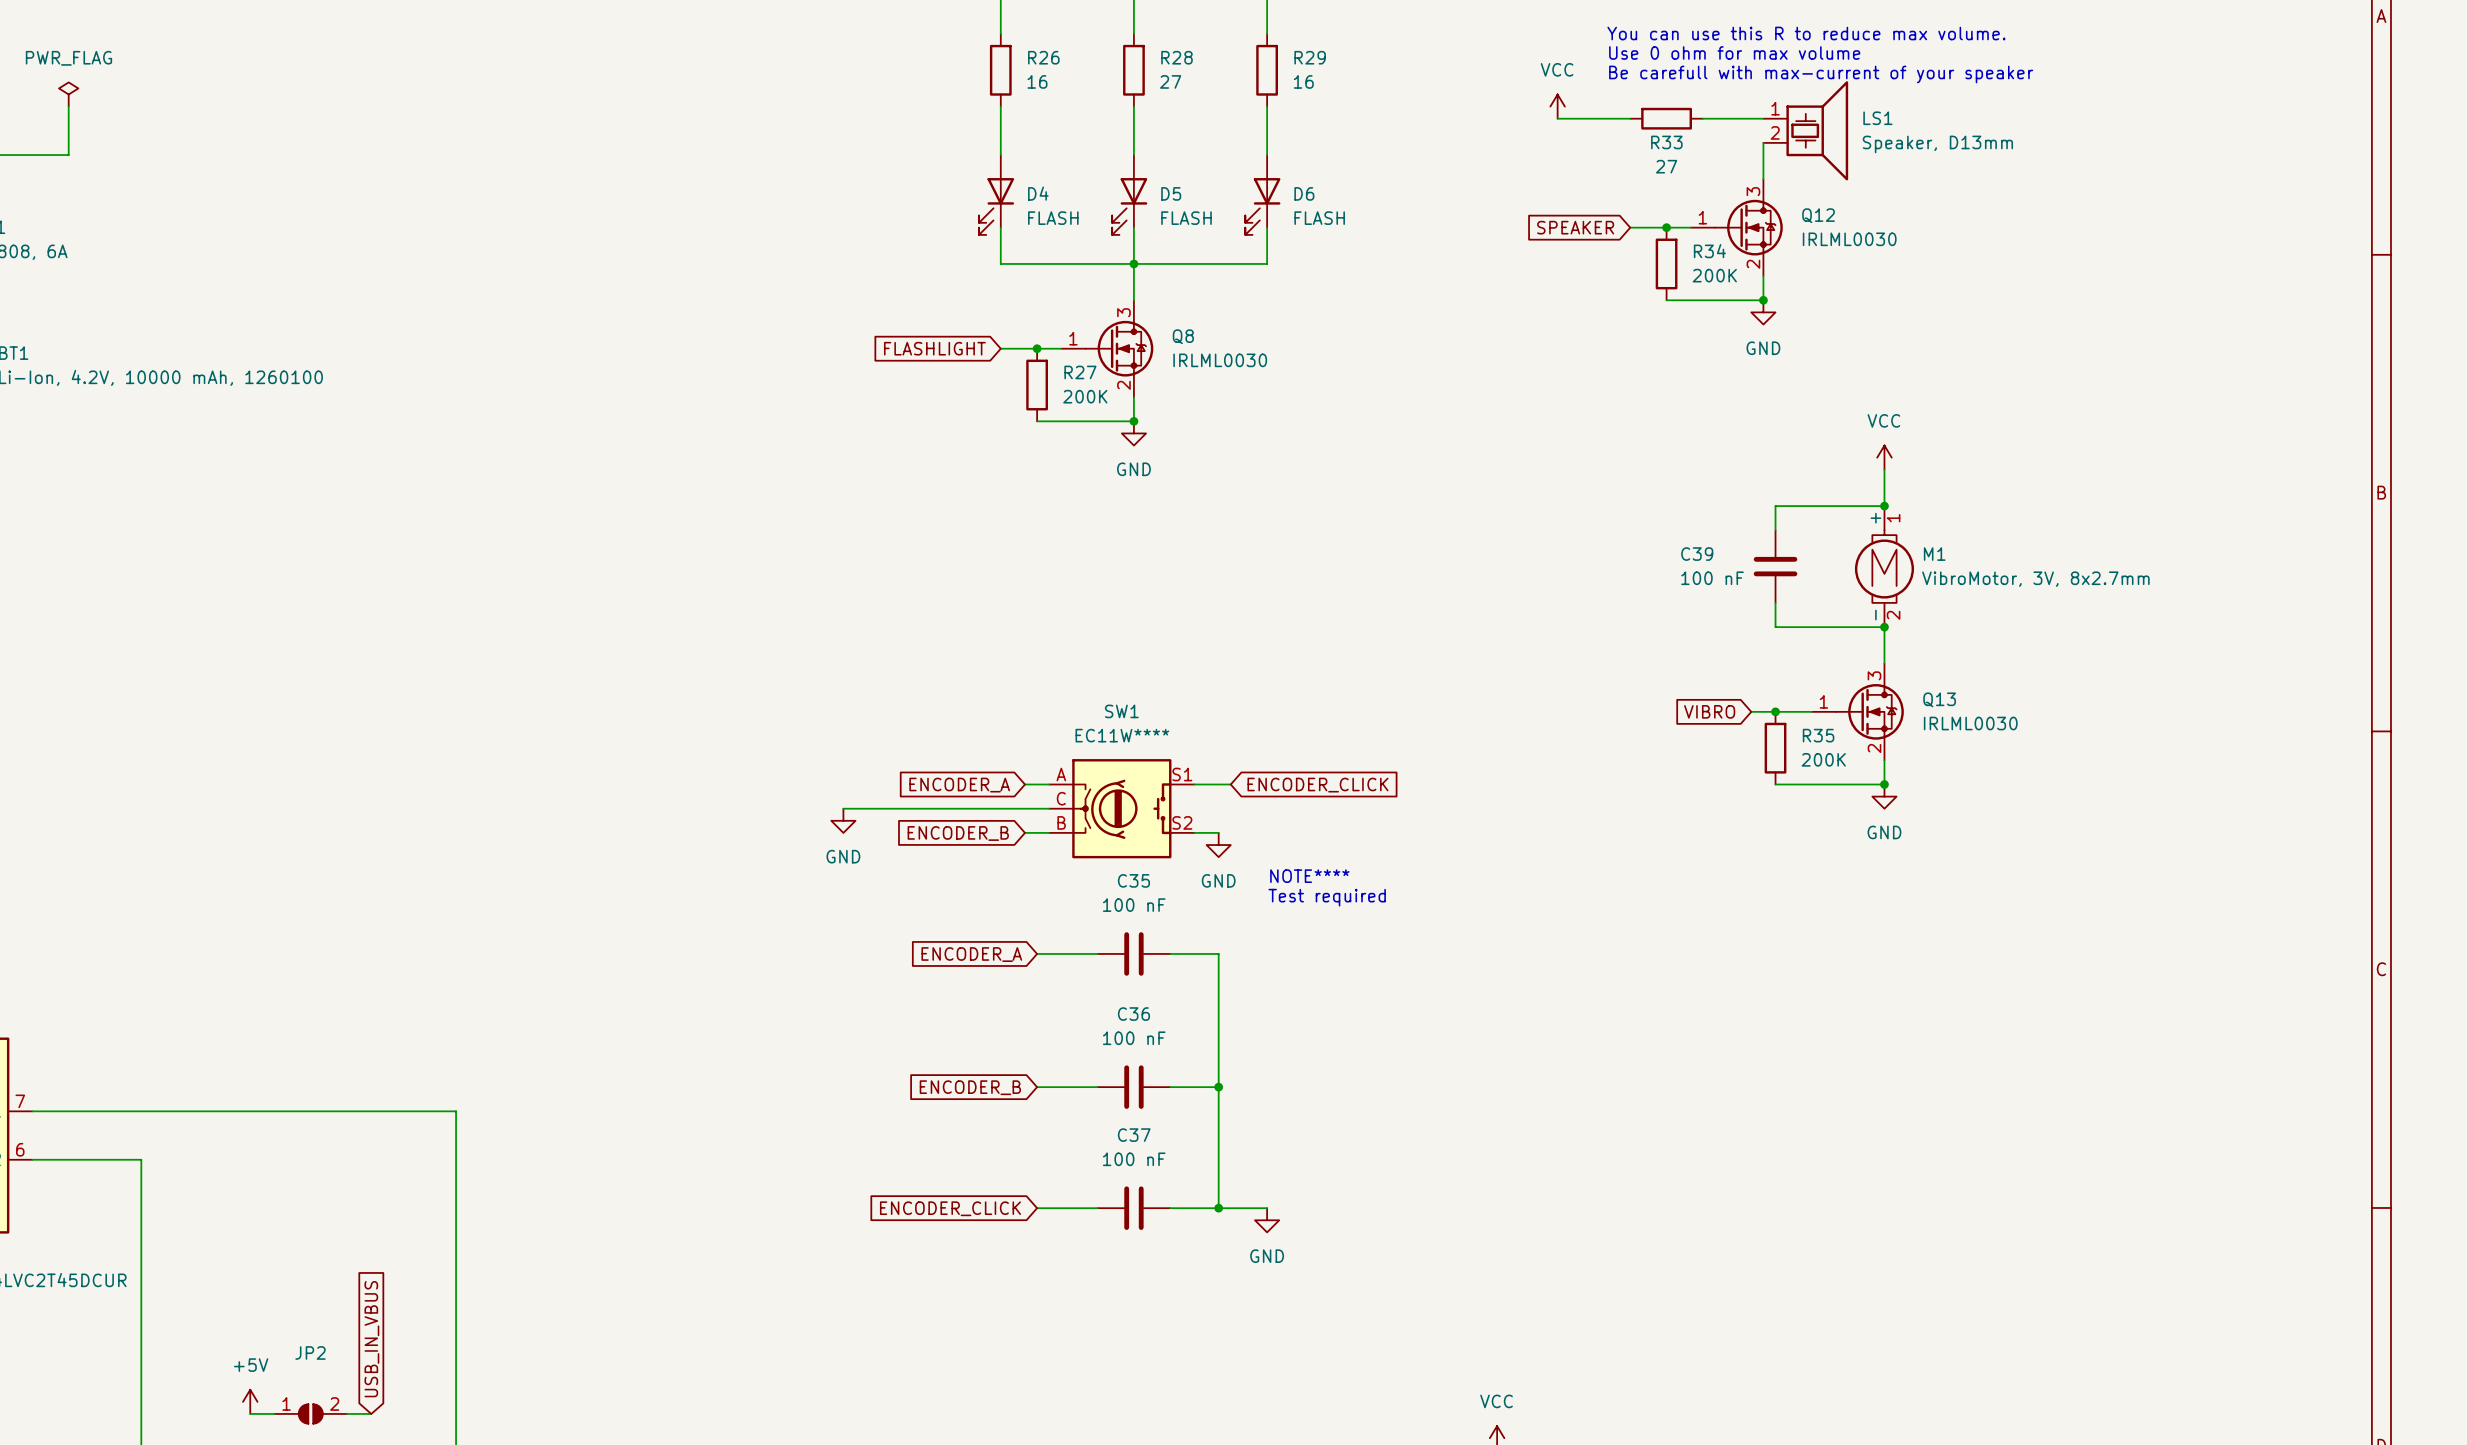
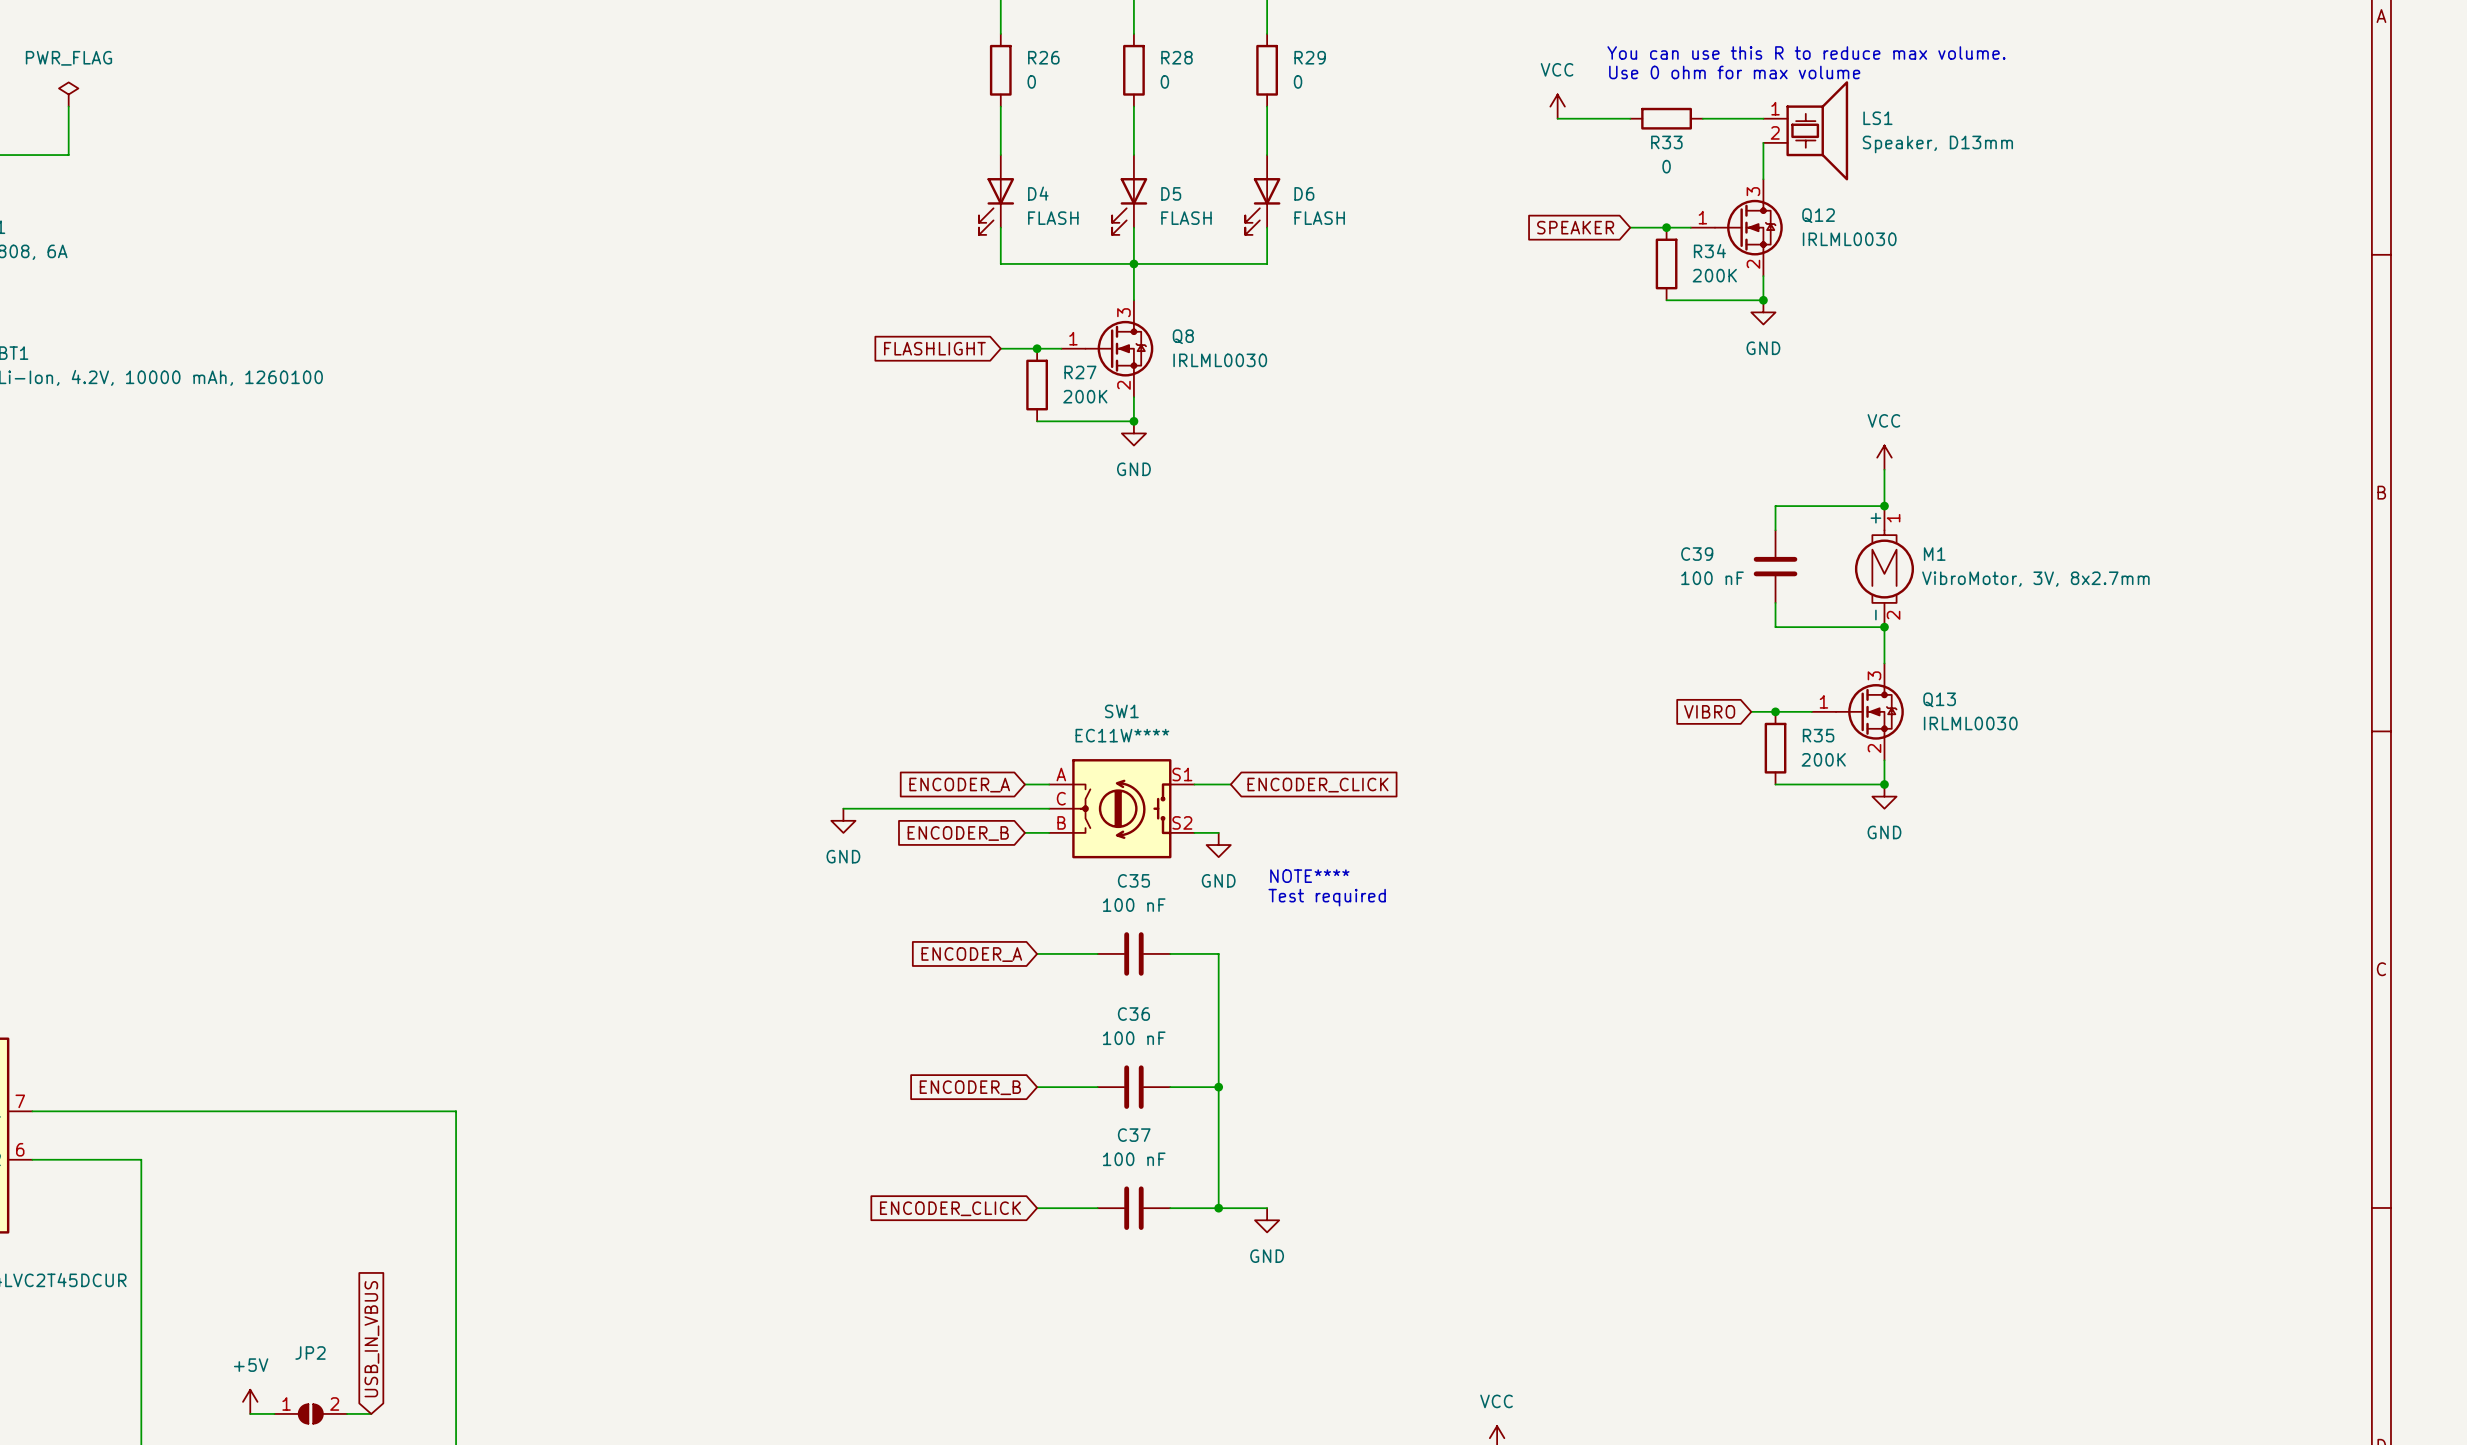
text: You can use this R to reduce max volume. (1806, 33) -> none
text: Use 0 ohm for max volume (1734, 52) -> You can use this R to reduce max volume. (1806, 52)
text: Be carefull with max-current of your speaker (1821, 74) -> Use 0 ohm for max volume (1734, 72)
R26 value: 16 (1037, 81) -> 0 (1031, 81)
R28 value: 27 (1170, 81) -> 0 (1164, 81)
R29 value: 16 (1303, 81) -> 0 (1298, 81)
R33 value: 27 (1666, 166) -> 0 (1666, 166)
SW1 symbol: [1049, 759, 1195, 859] -> [1049, 759, 1195, 859]

